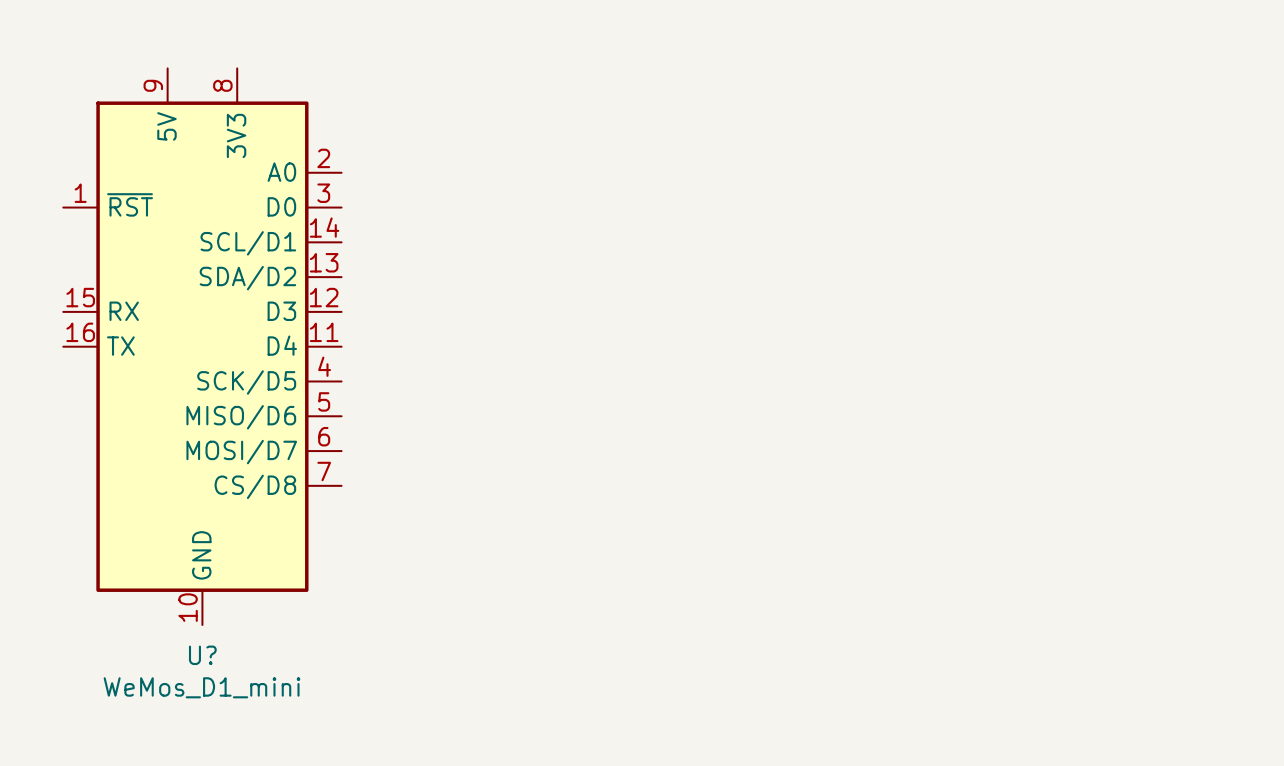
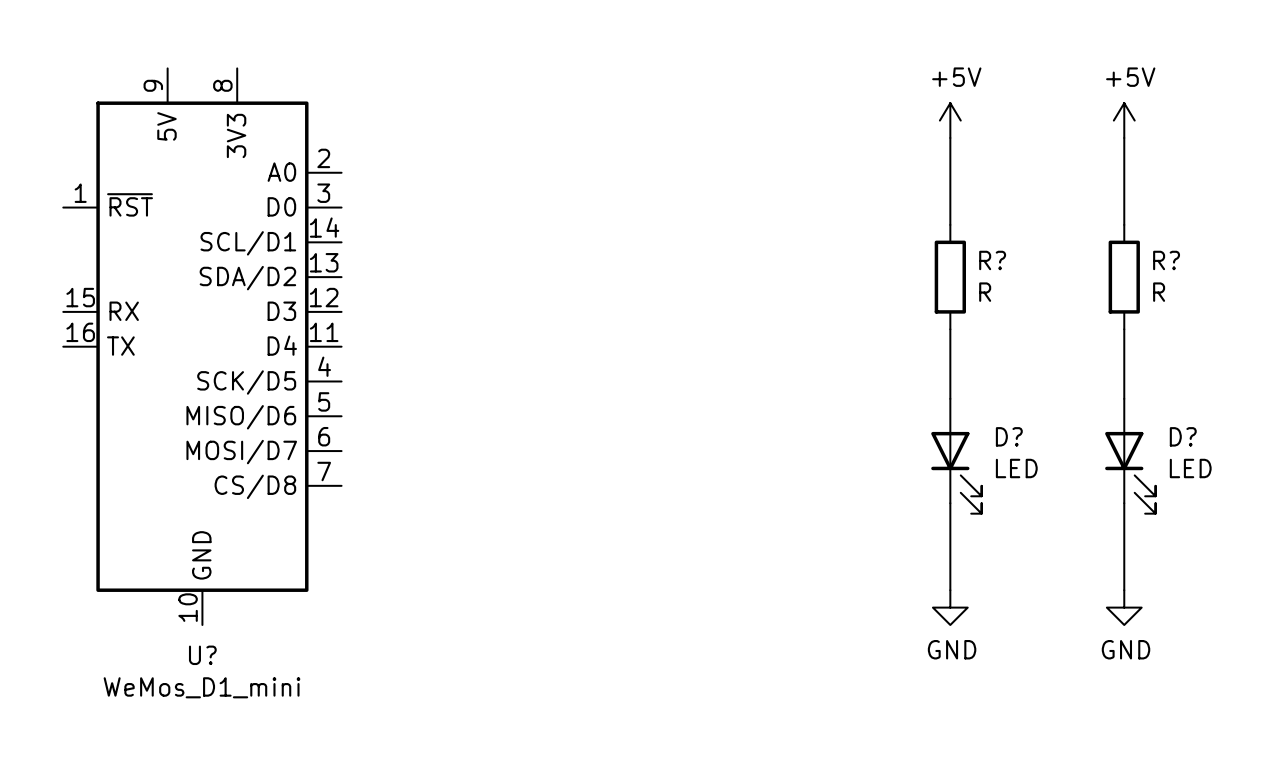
power symbol: none -> +5V (950, 120)
power symbol: none -> +5V (1124, 120)
wire: none -> (950, 137) (950, 224)
wire: none -> (1124, 137) (1124, 224)
R?: none -> R (950, 277)
R?: none -> R (1124, 277)
wire: none -> (950, 329) (950, 398)
wire: none -> (1124, 329) (1124, 398)
D?: none -> LED (956, 456)
D?: none -> LED (1130, 456)
wire: none -> (950, 503) (950, 590)
wire: none -> (1124, 503) (1124, 590)
power symbol: none -> GND (950, 607)
power symbol: none -> GND (1124, 607)

